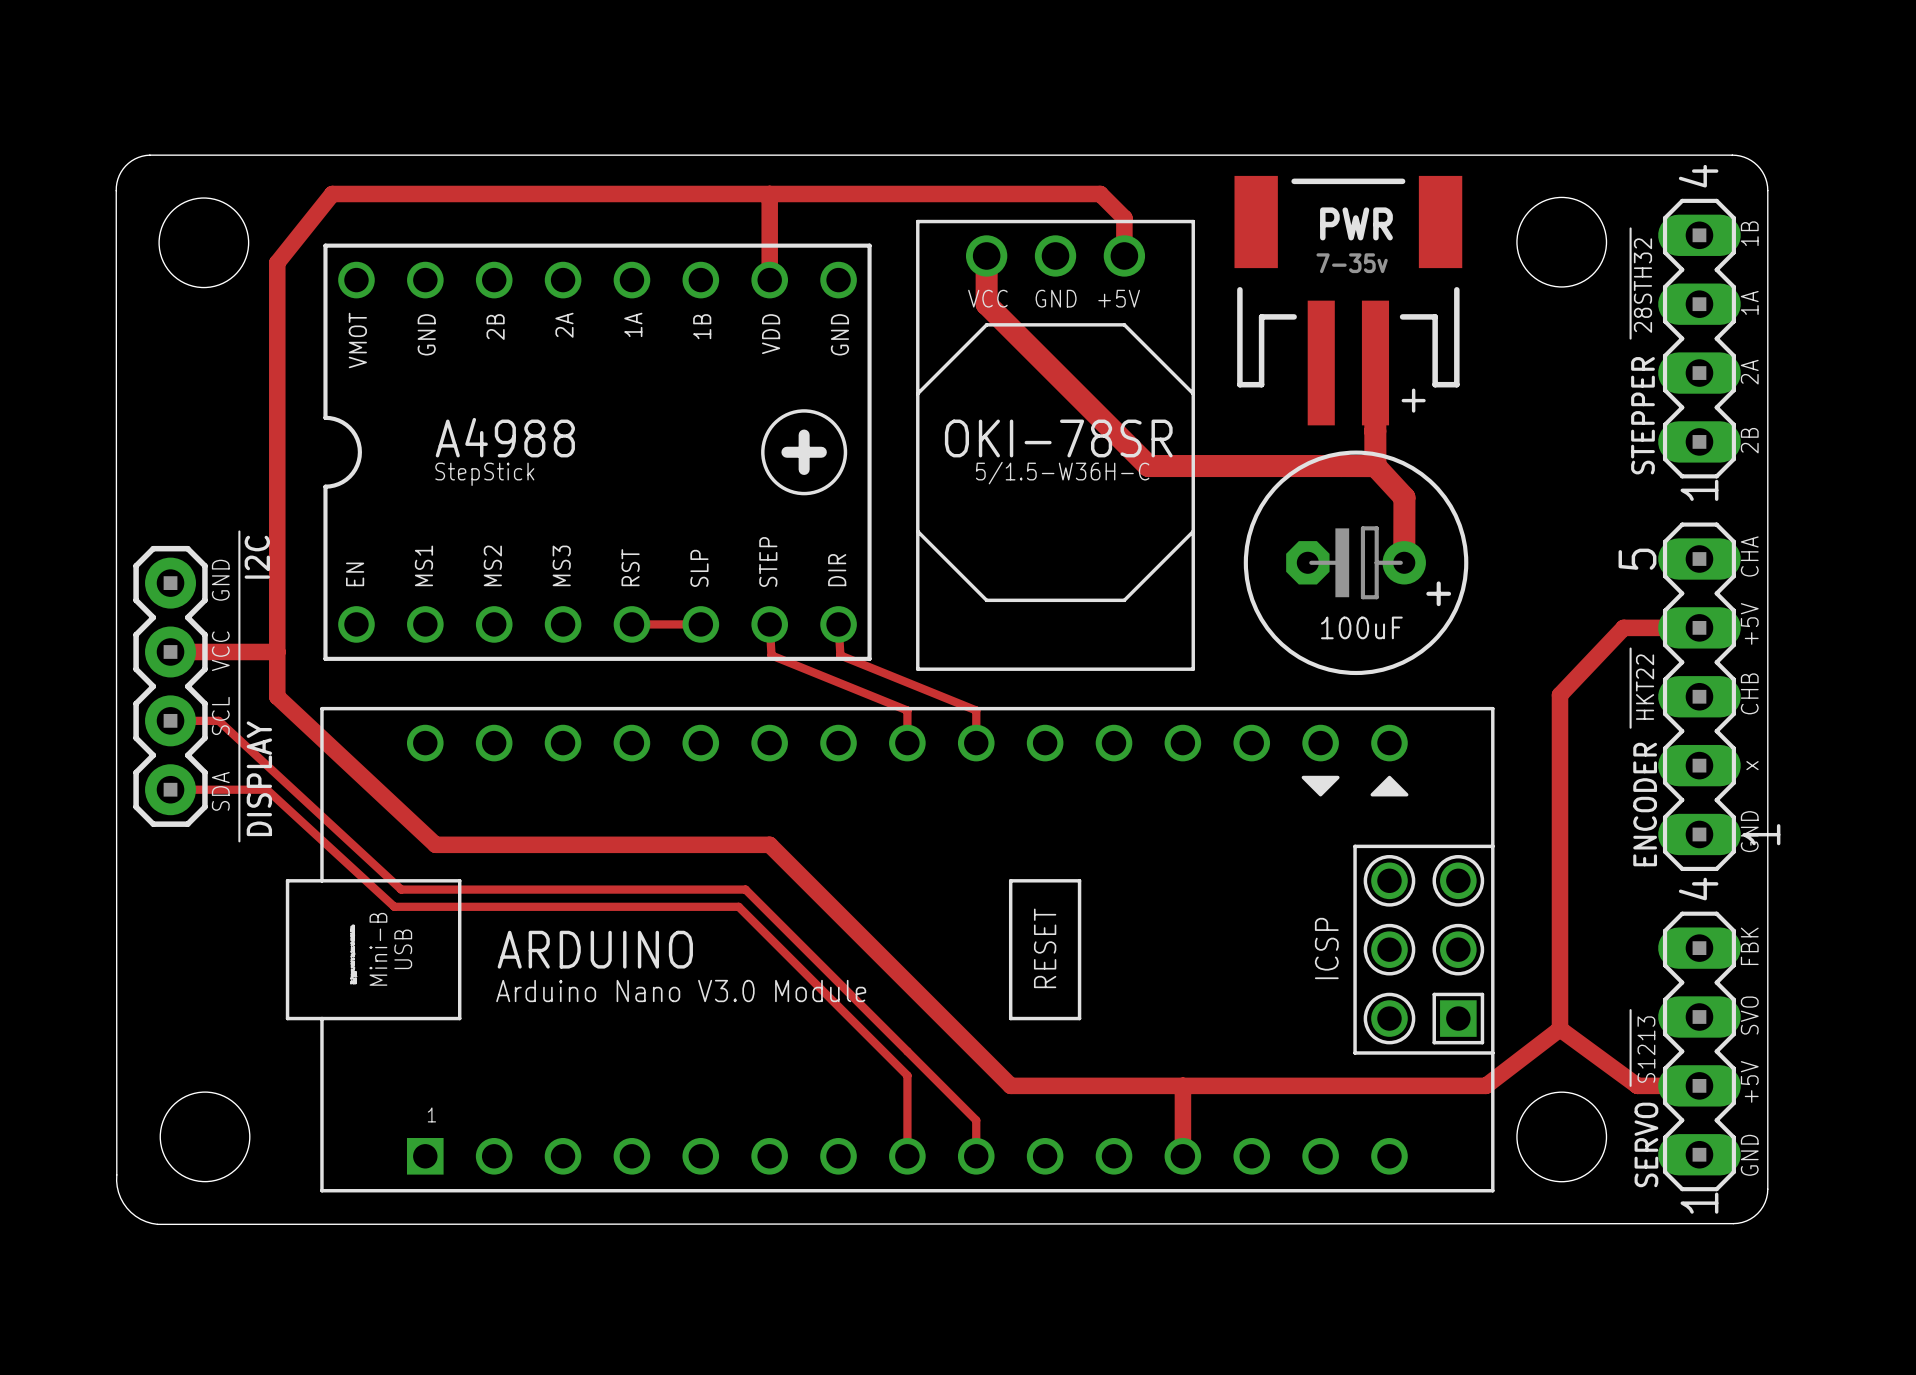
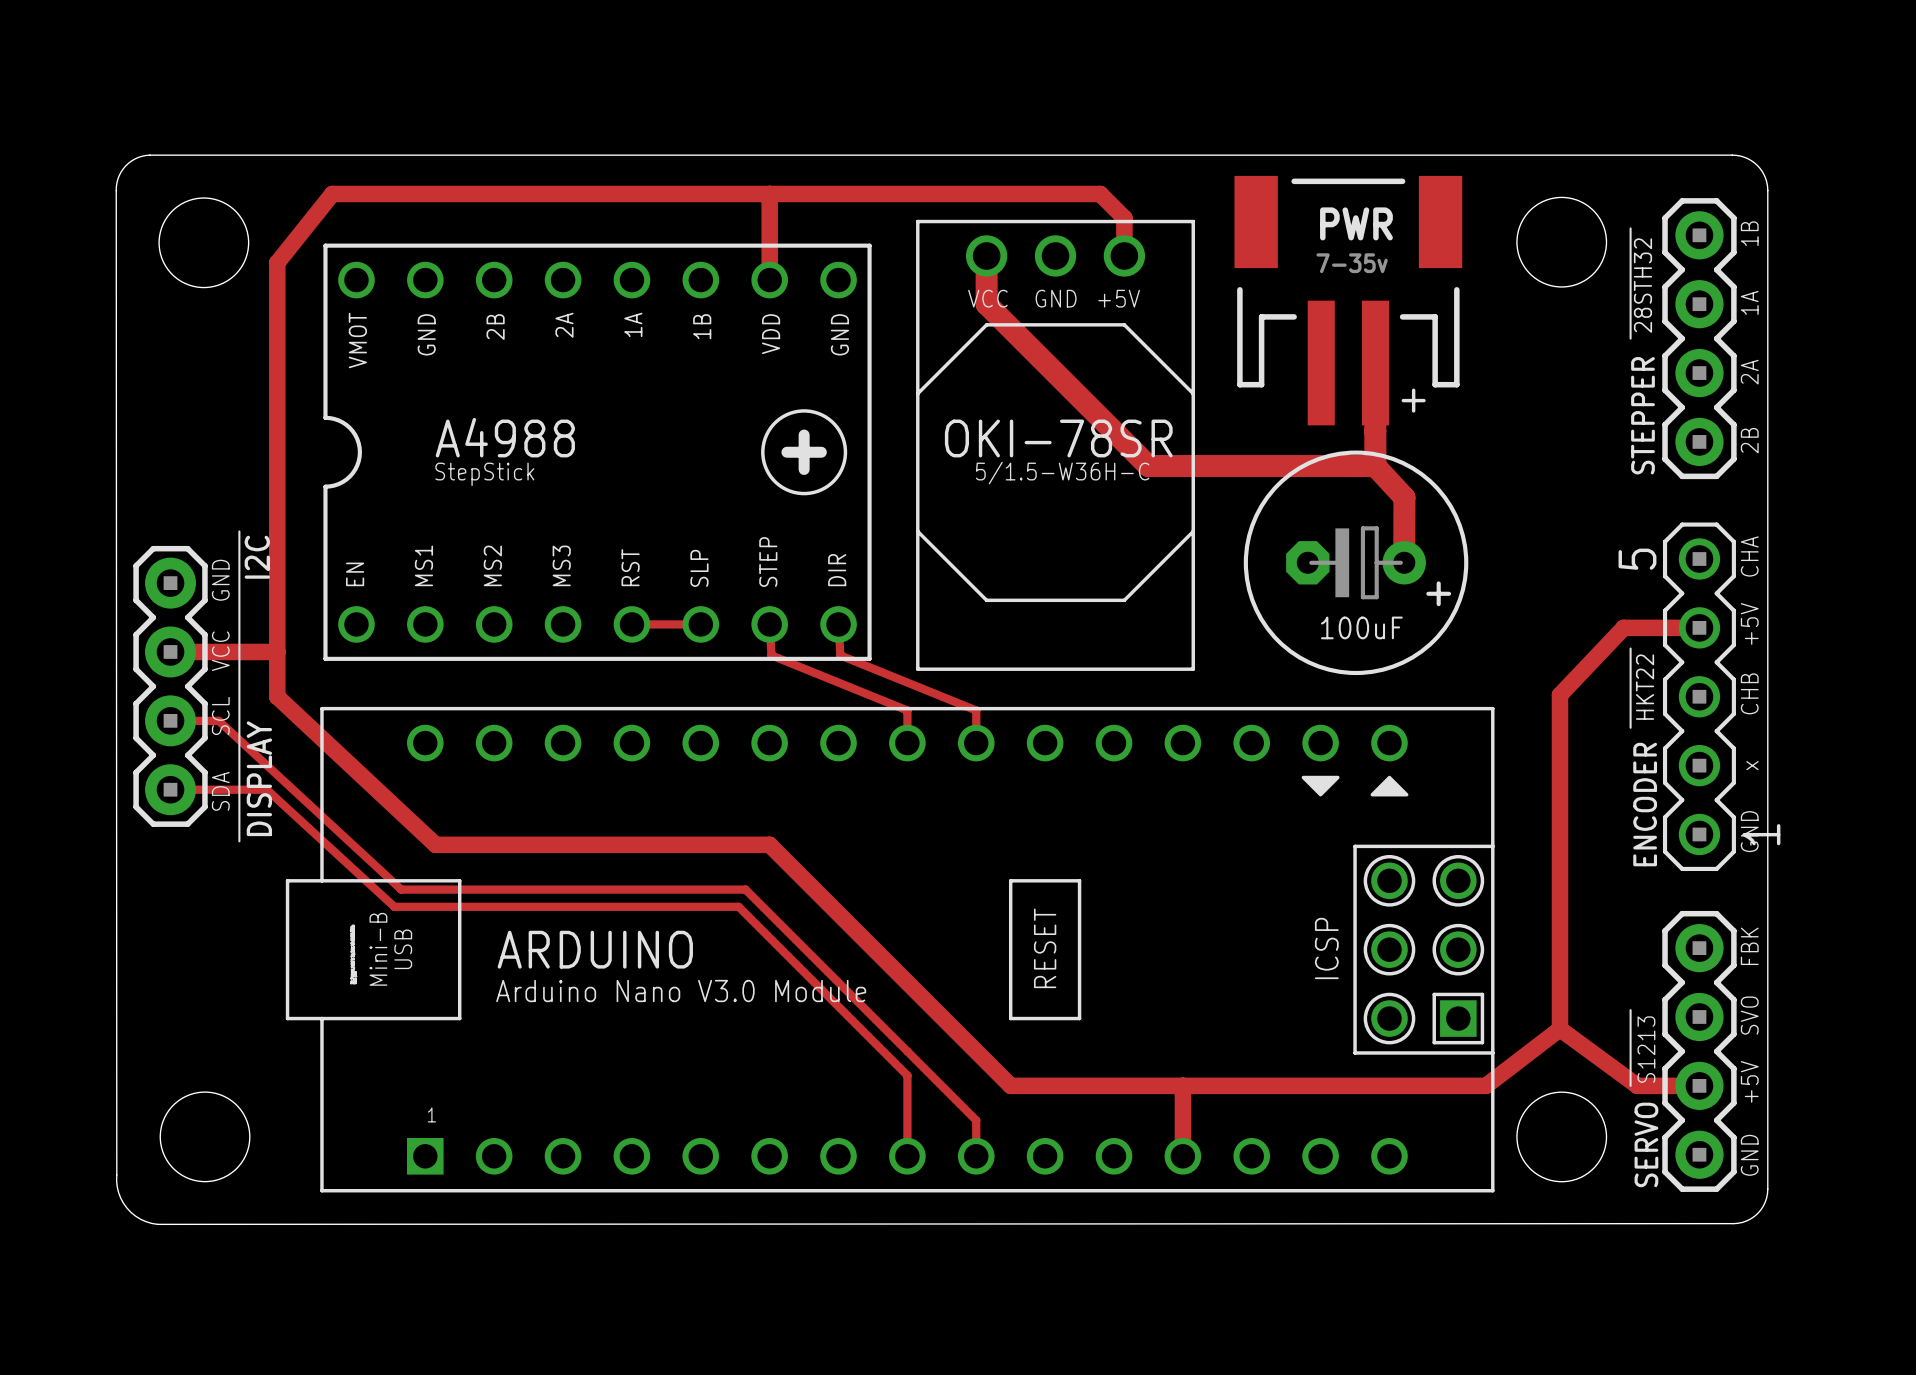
STEPPER footprint: [1658, 198, 1741, 479] -> [1662, 198, 1737, 480]
ENCODER footprint: [1658, 522, 1741, 871] -> [1662, 522, 1736, 871]
SERVO footprint: [1658, 911, 1741, 1192] -> [1662, 910, 1737, 1192]

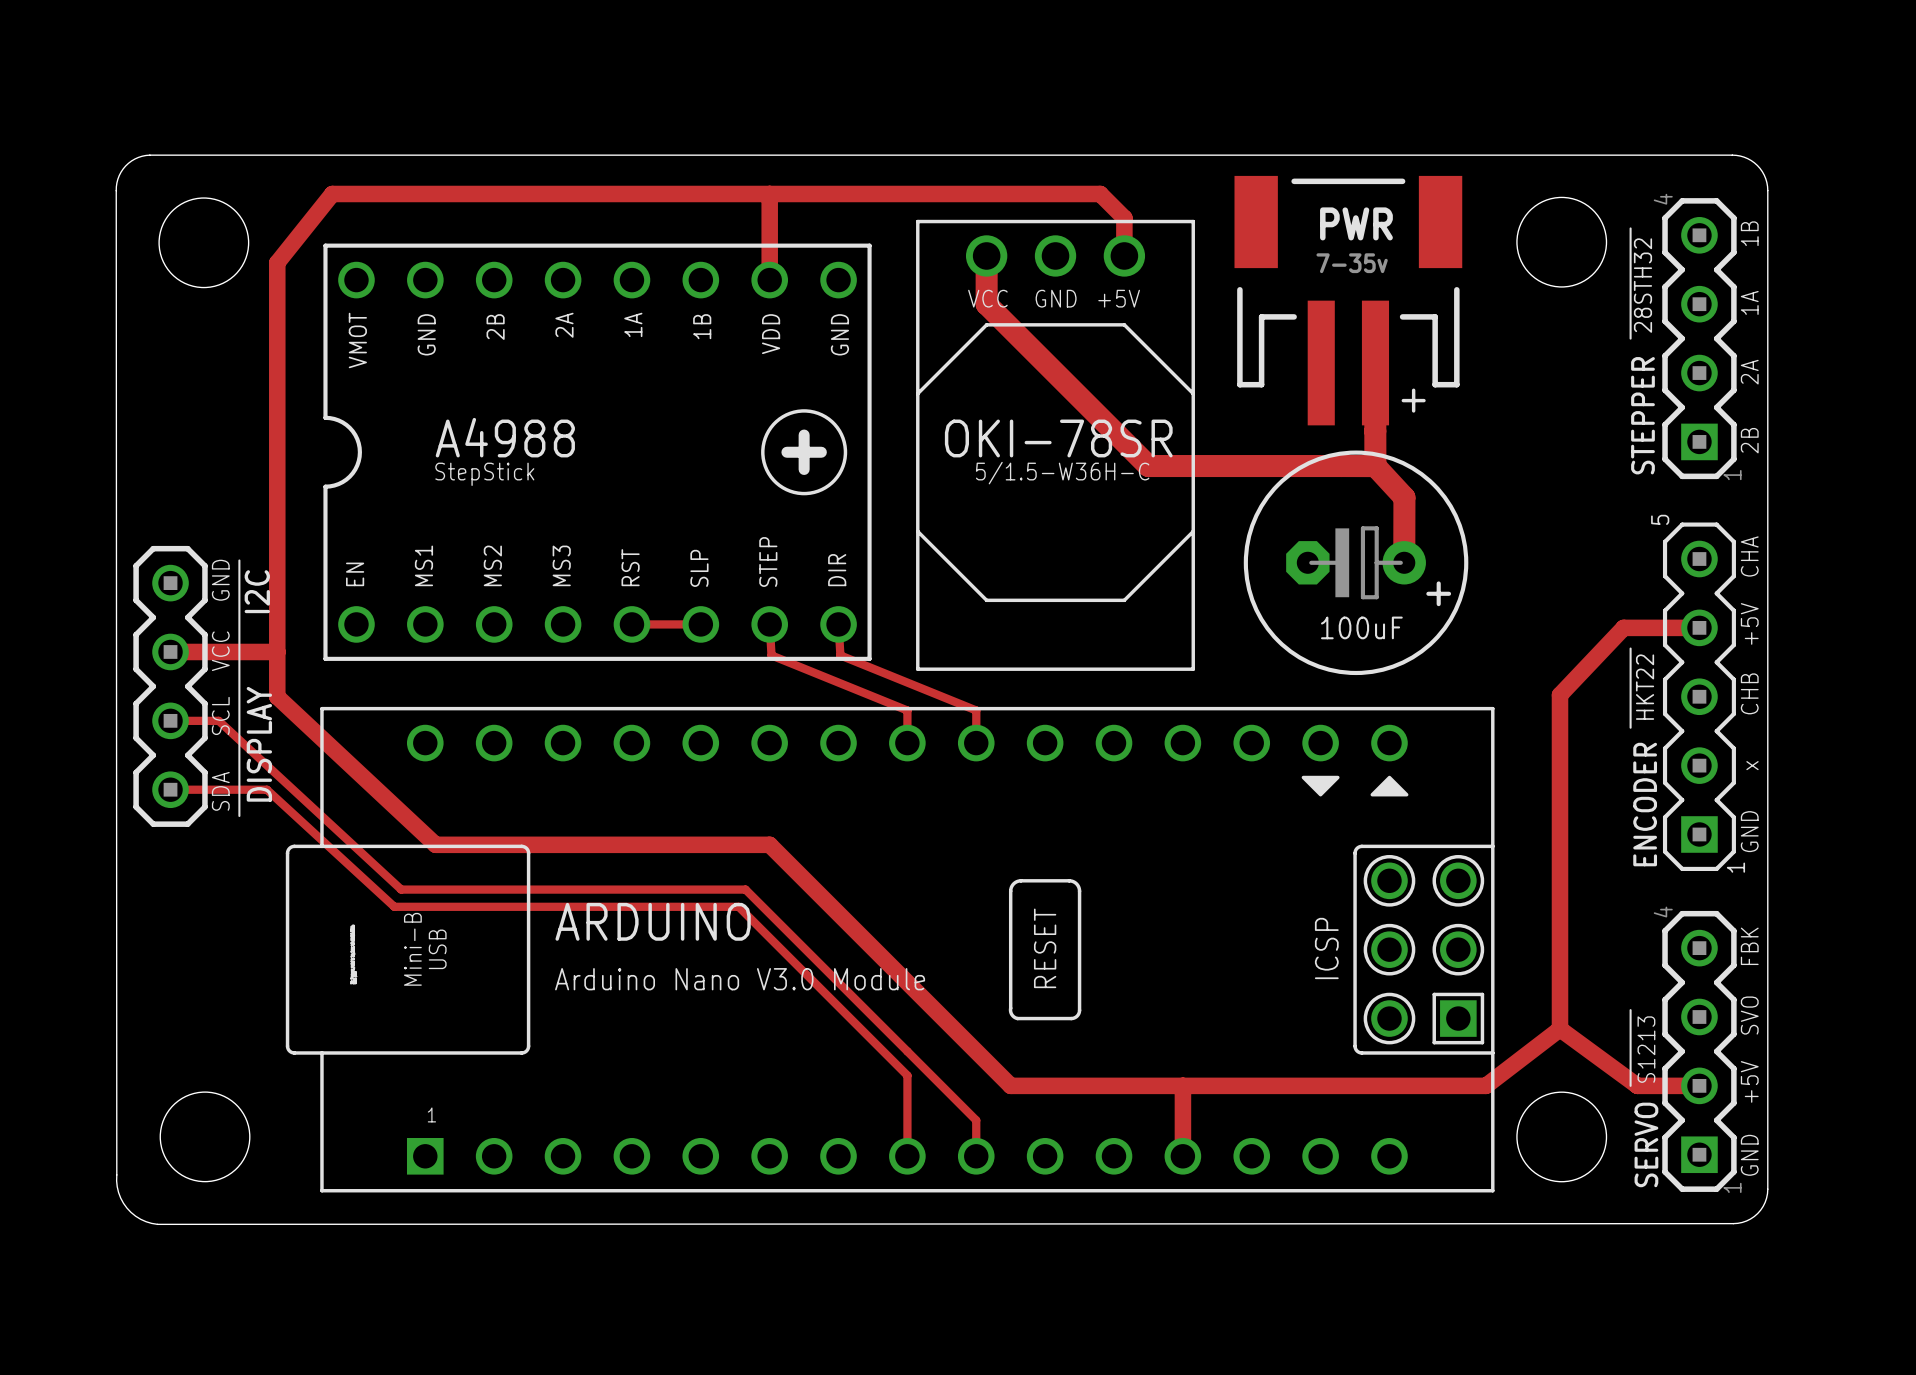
STEPPER footprint: [1662, 198, 1737, 480] -> [1662, 198, 1737, 480]
ENCODER footprint: [1662, 522, 1736, 871] -> [1662, 522, 1736, 871]
line: (239, 531) (239, 560) -> none
DISPLAY footprint: [133, 545, 208, 827] -> [133, 545, 208, 827]
DISPLAY value position: I2C (257, 557) -> I2C (257, 591)
ARDUINO footprint: [285, 706, 1495, 1193] -> [285, 706, 1495, 1193]
DISPLAY name position: DISPLAY (259, 778) -> DISPLAY (259, 744)
line: (239, 815) (239, 841) -> none
SERVO footprint: [1662, 910, 1737, 1192] -> [1662, 910, 1737, 1192]
ARDUINO name position: ARDUINO (595, 949) -> ARDUINO (653, 921)
ARDUINO value position: Arduino Nano V3.0 Module (681, 991) -> Arduino Nano V3.0 Module (740, 979)

